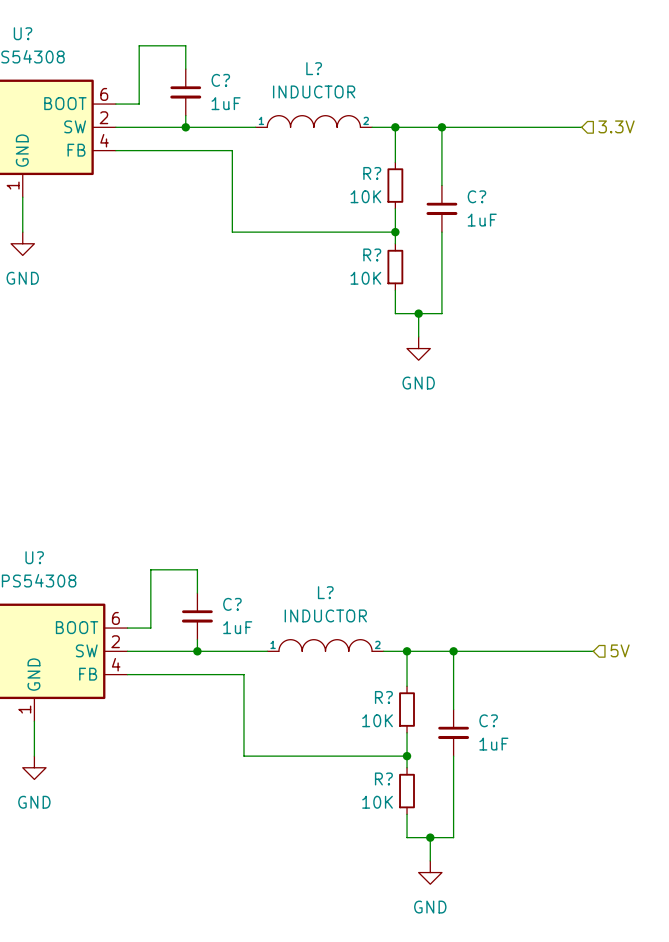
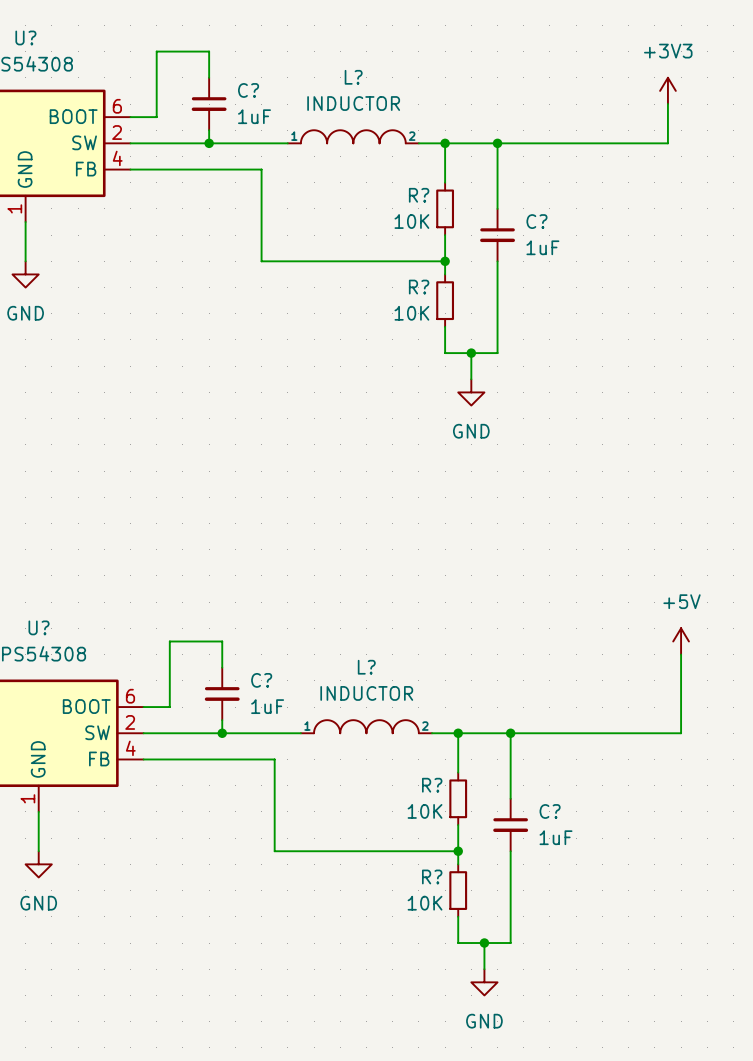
power symbol: none -> +3V3 (667, 90)
wire: none -> (667, 104) (667, 143) (654, 143)
hierarchical label: 3.3V (616, 126) -> none
power symbol: none -> +5V (681, 641)
wire: none -> (681, 654) (681, 733) (667, 733)
hierarchical label: 5V (620, 650) -> none

